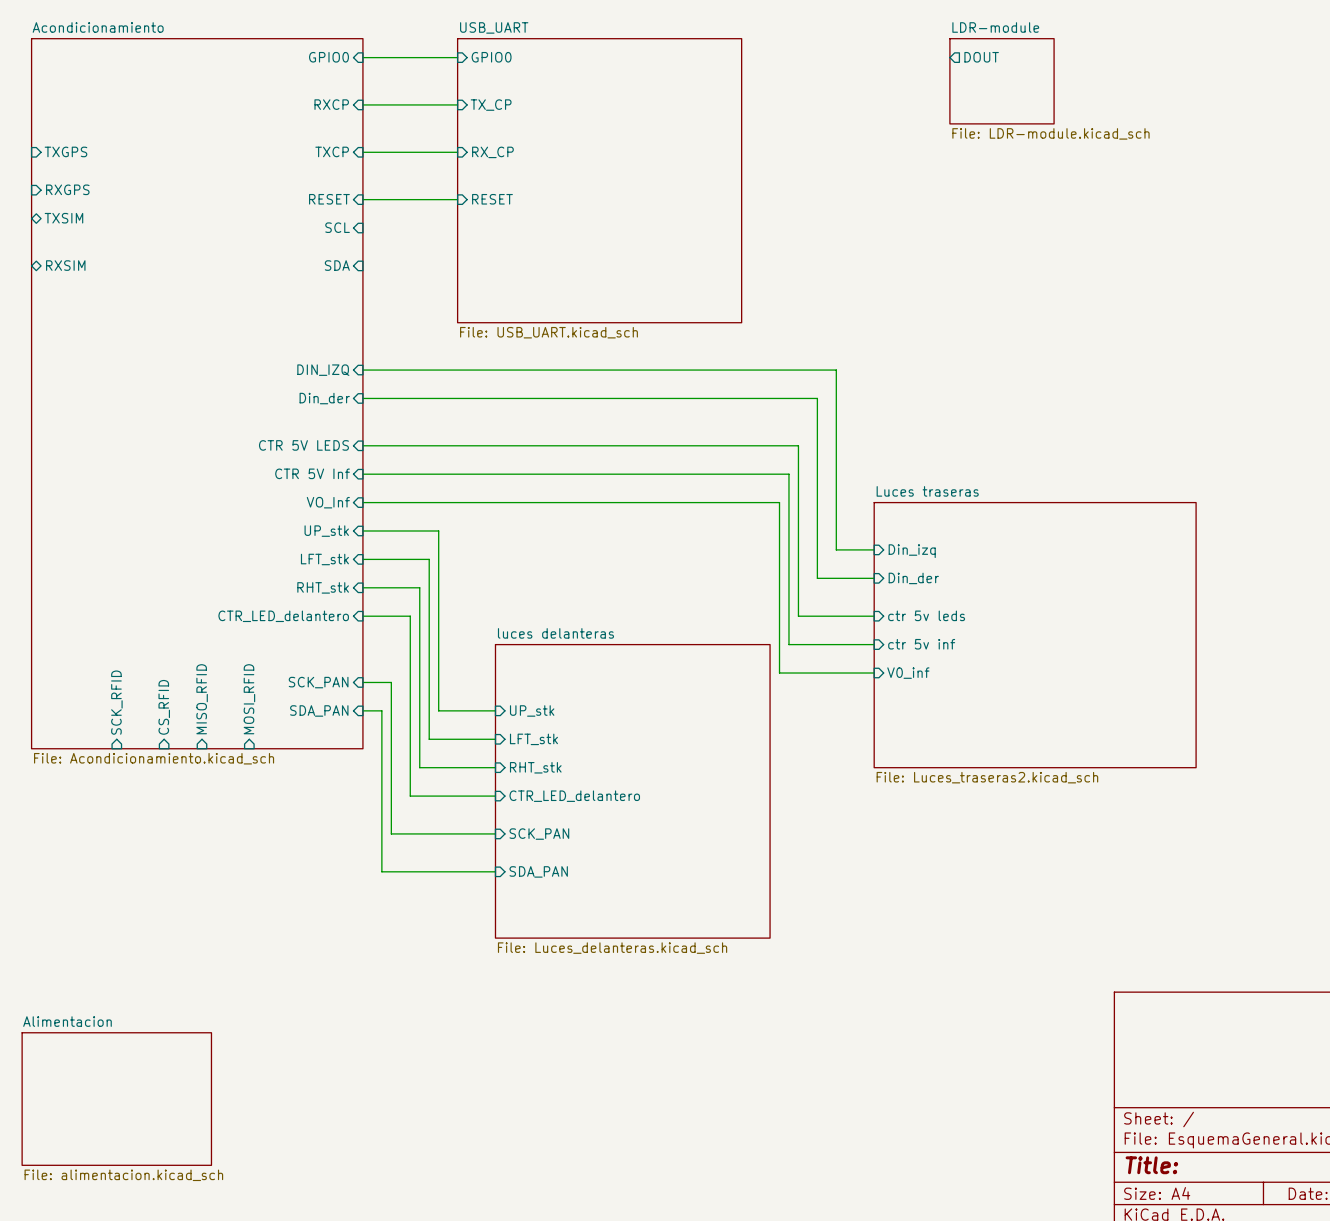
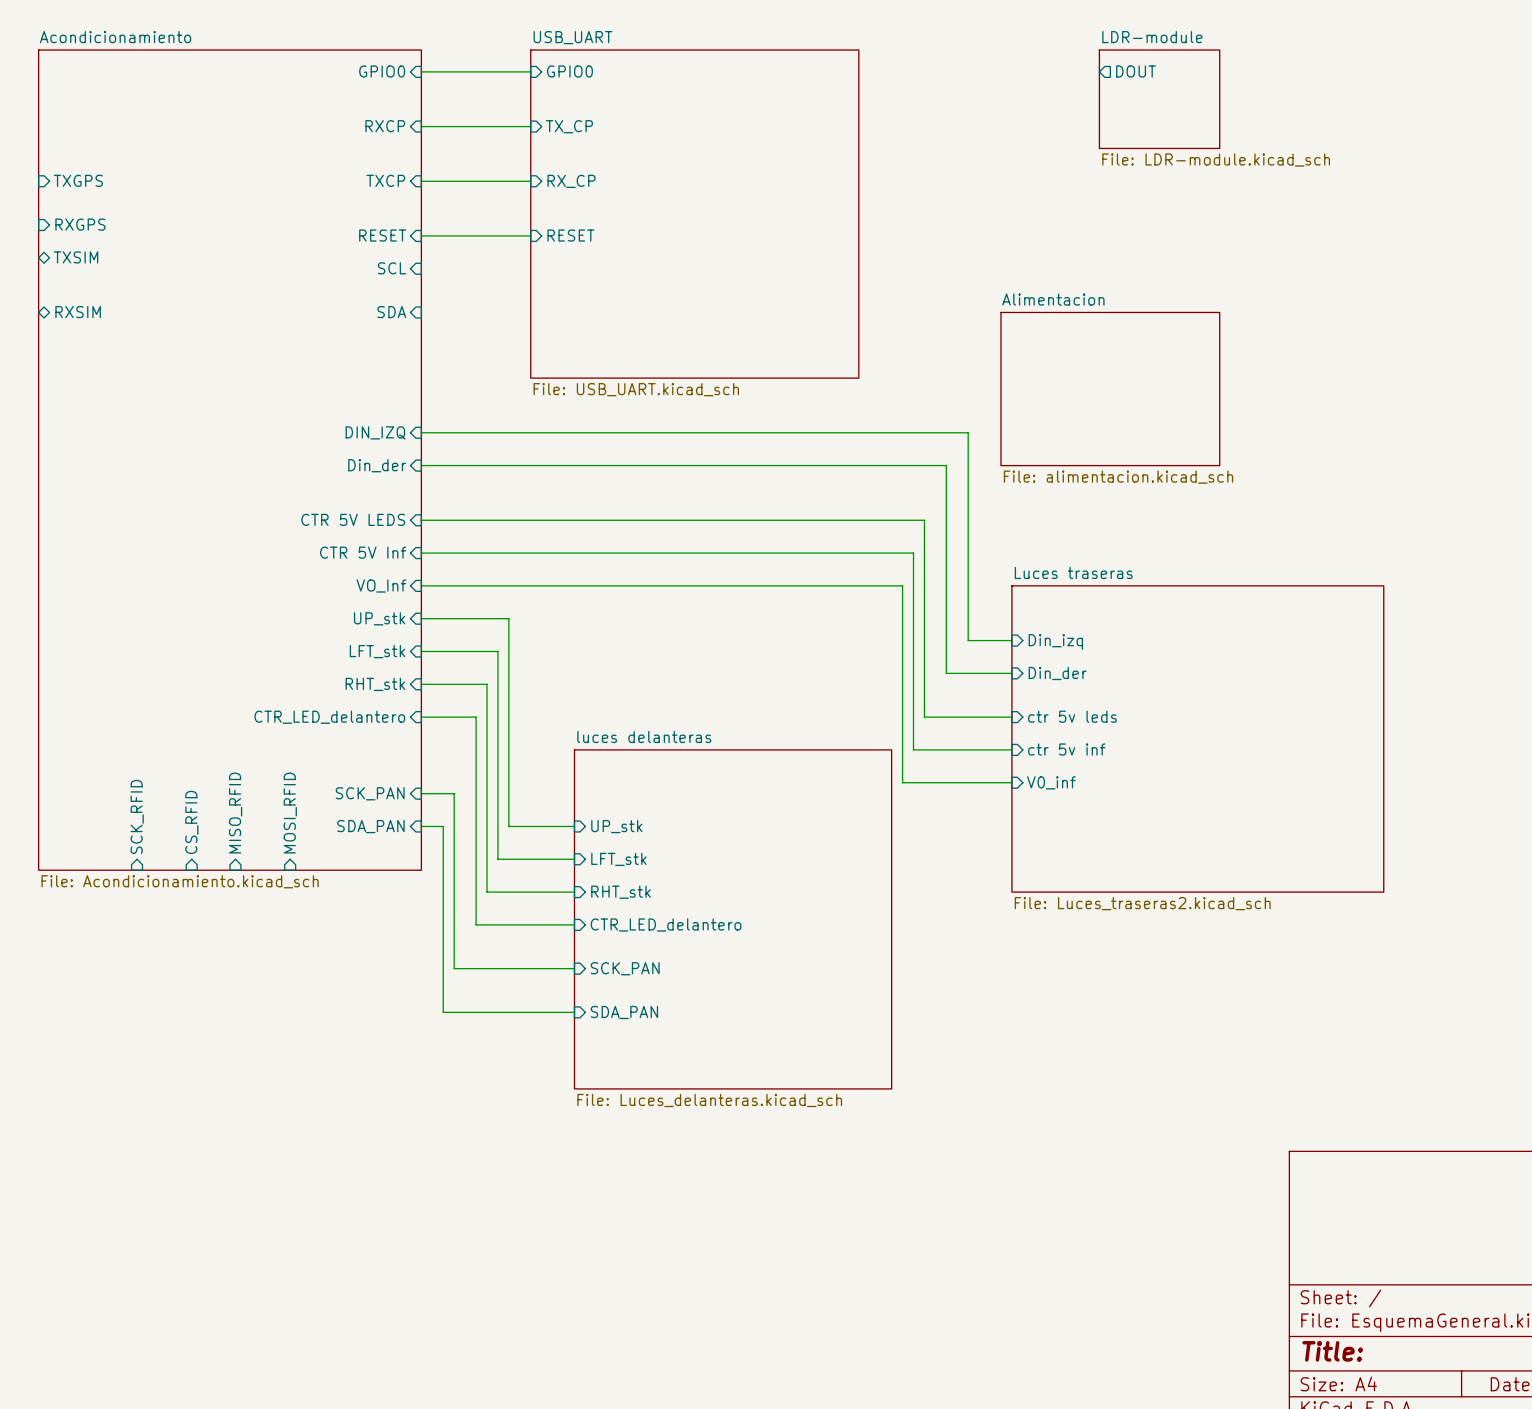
sheet Alimentacion: none -> File: alimentacion.kicad_sch (1110, 389)
sheet Alimentacion: File: alimentacion.kicad_sch (116, 1099) -> none

